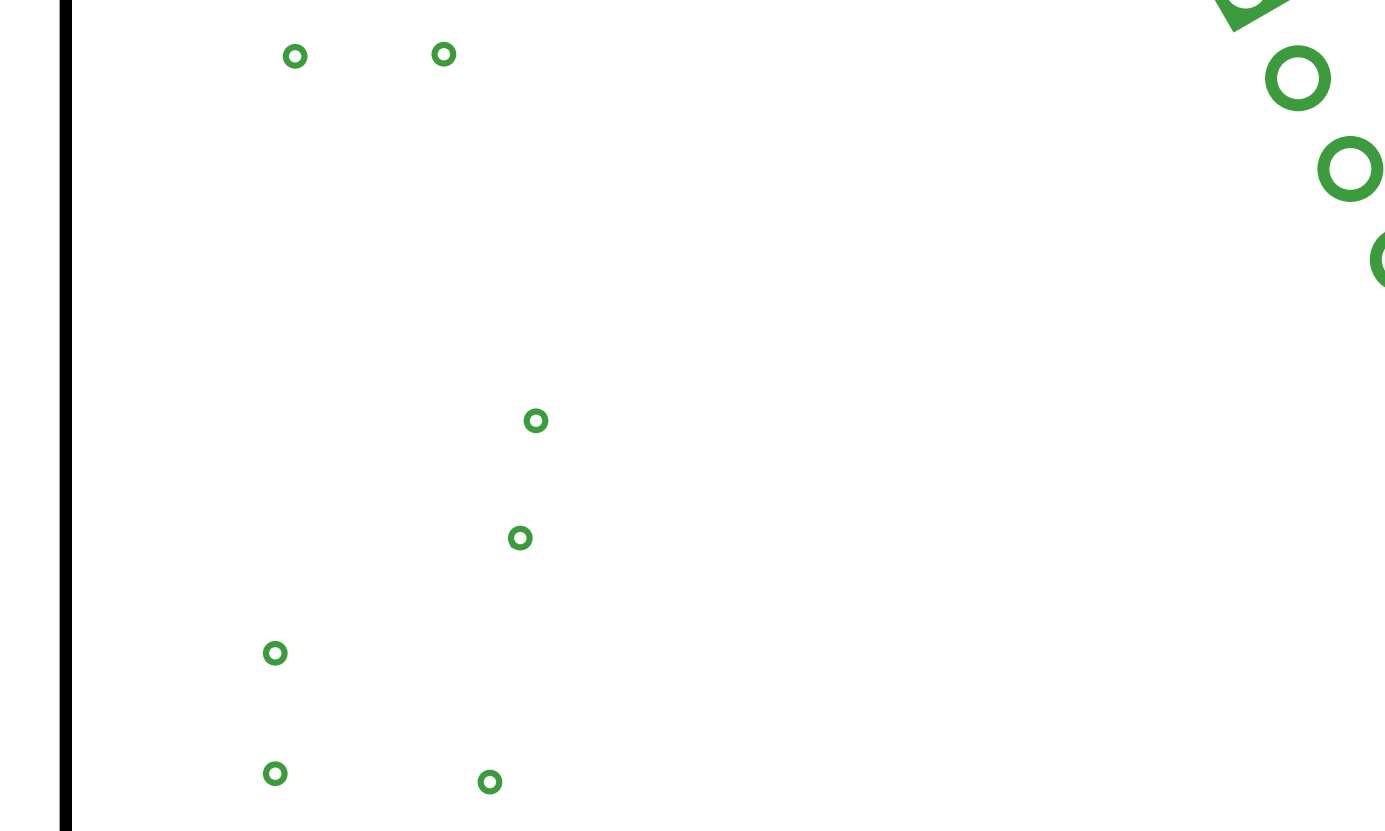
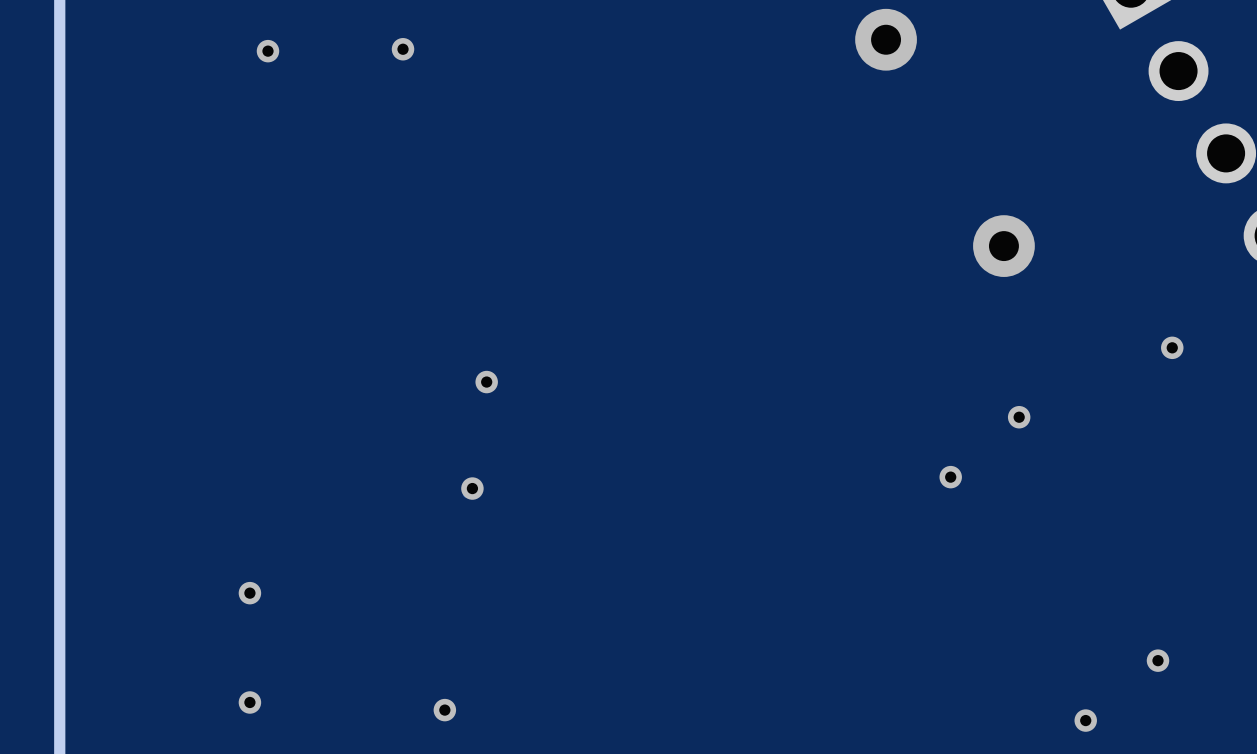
via: none -> (886, 39)
via: none -> (1003, 246)
via: none -> (1172, 347)
via: none -> (1019, 417)
via: none -> (950, 477)
via: none -> (1157, 660)
via: none -> (1085, 720)

